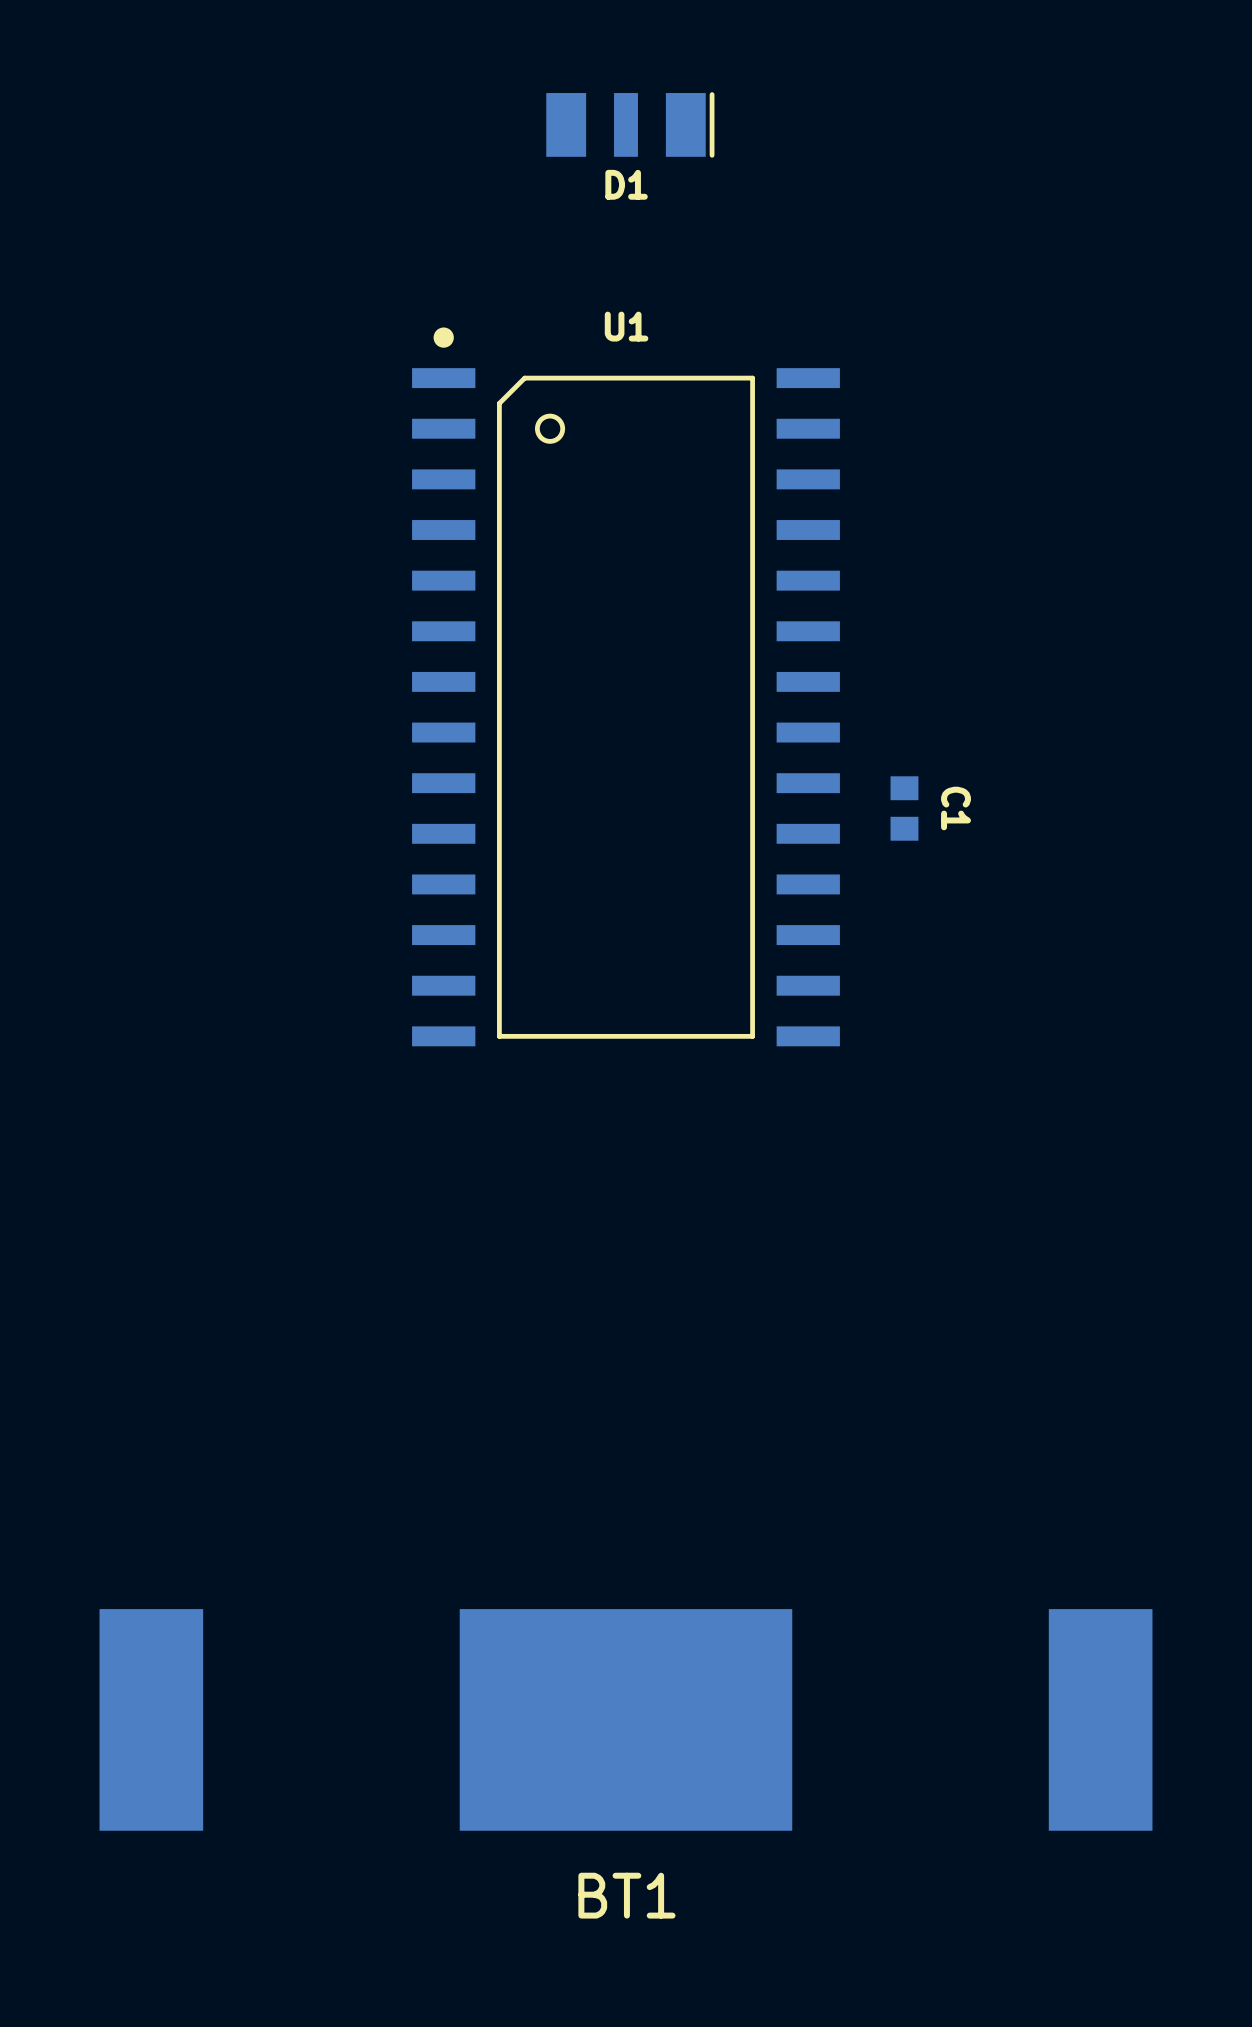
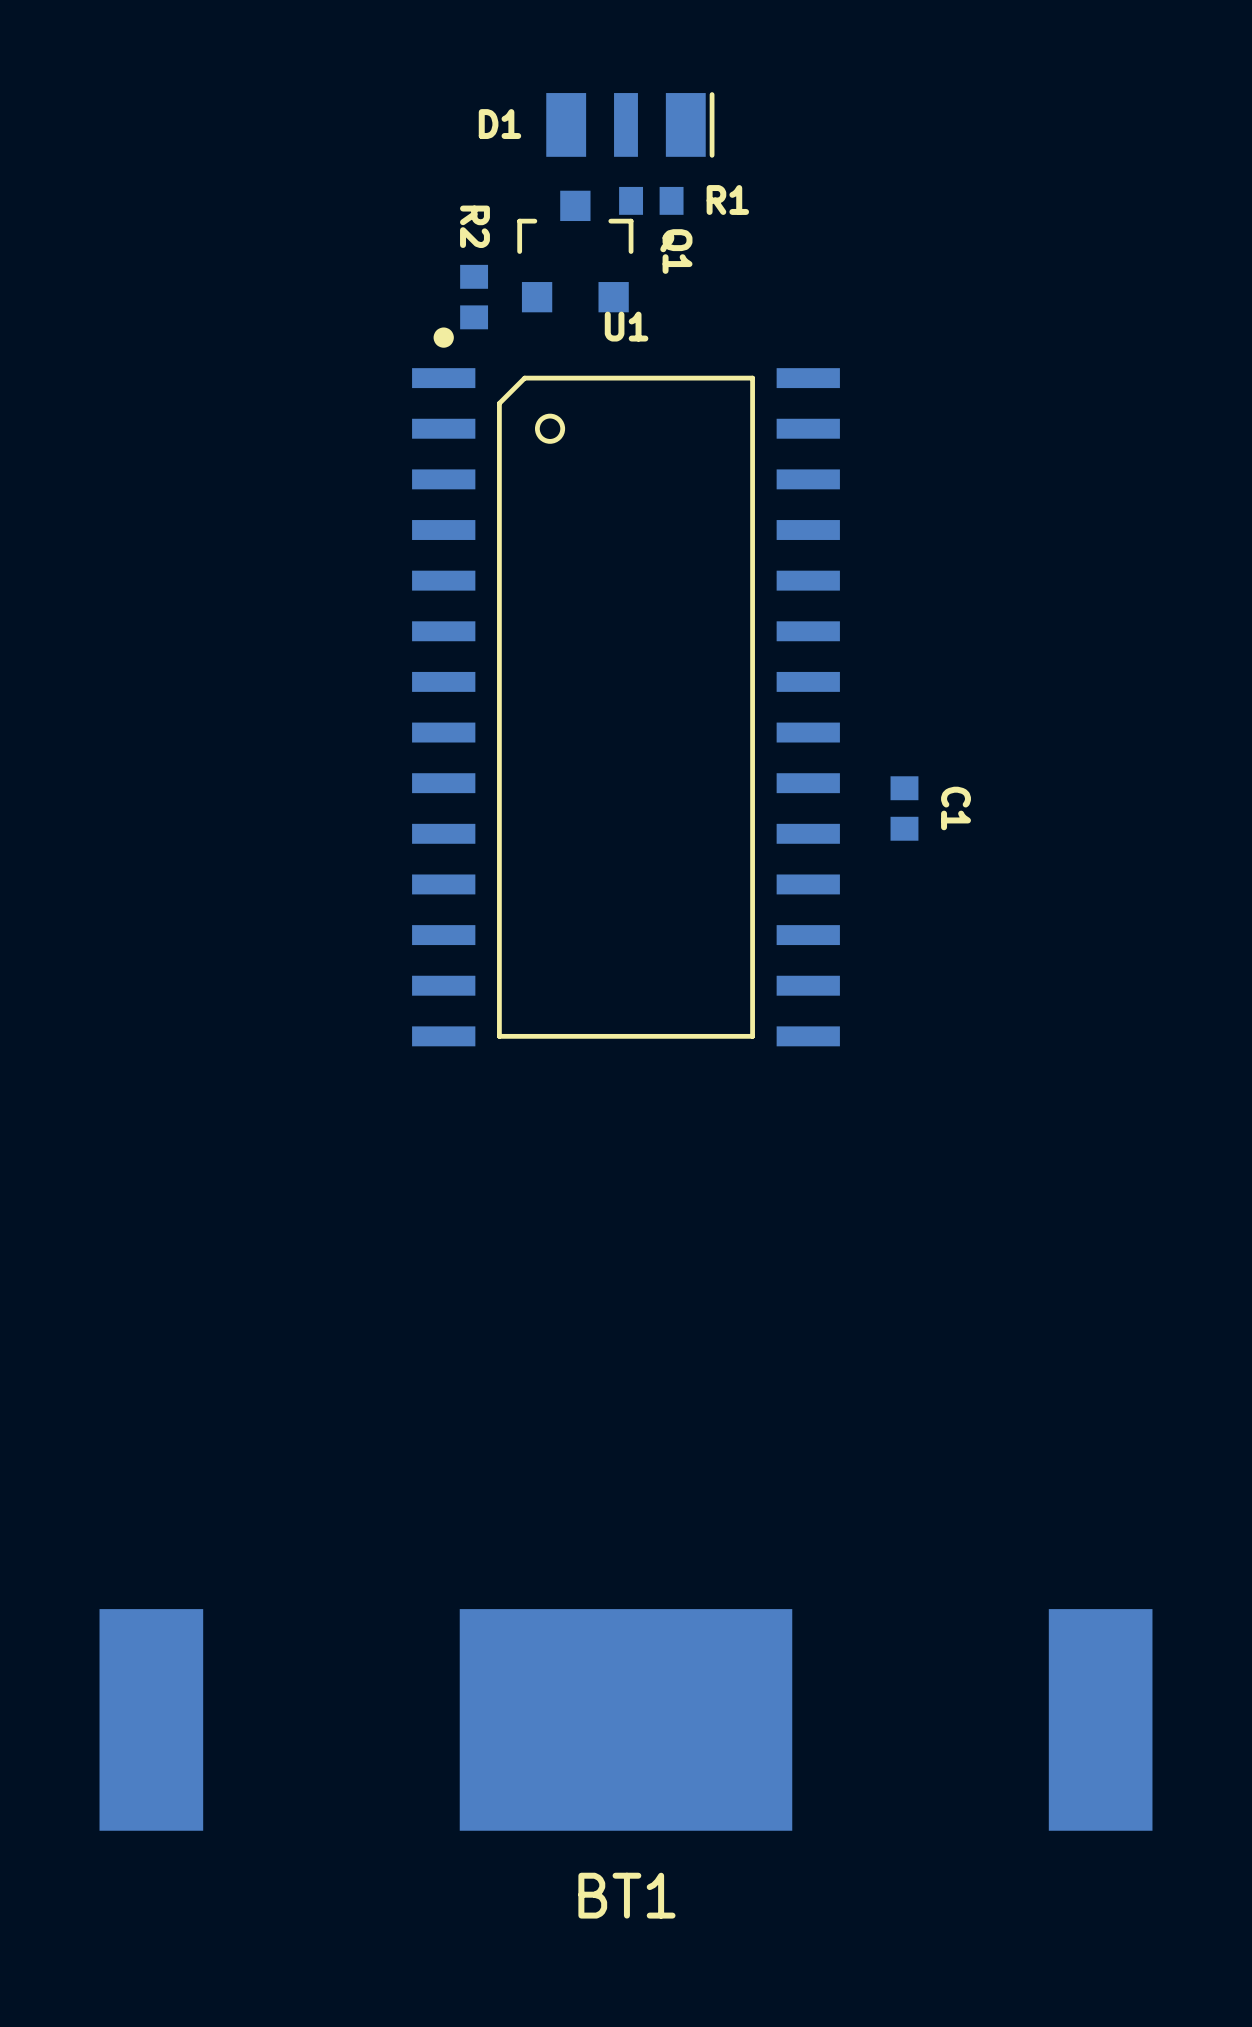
D1 name position: D1 (626, 184) -> D1 (499, 124)
R1: none -> (651, 200)
Q1: none -> (575, 251)
R2: none -> (474, 297)

